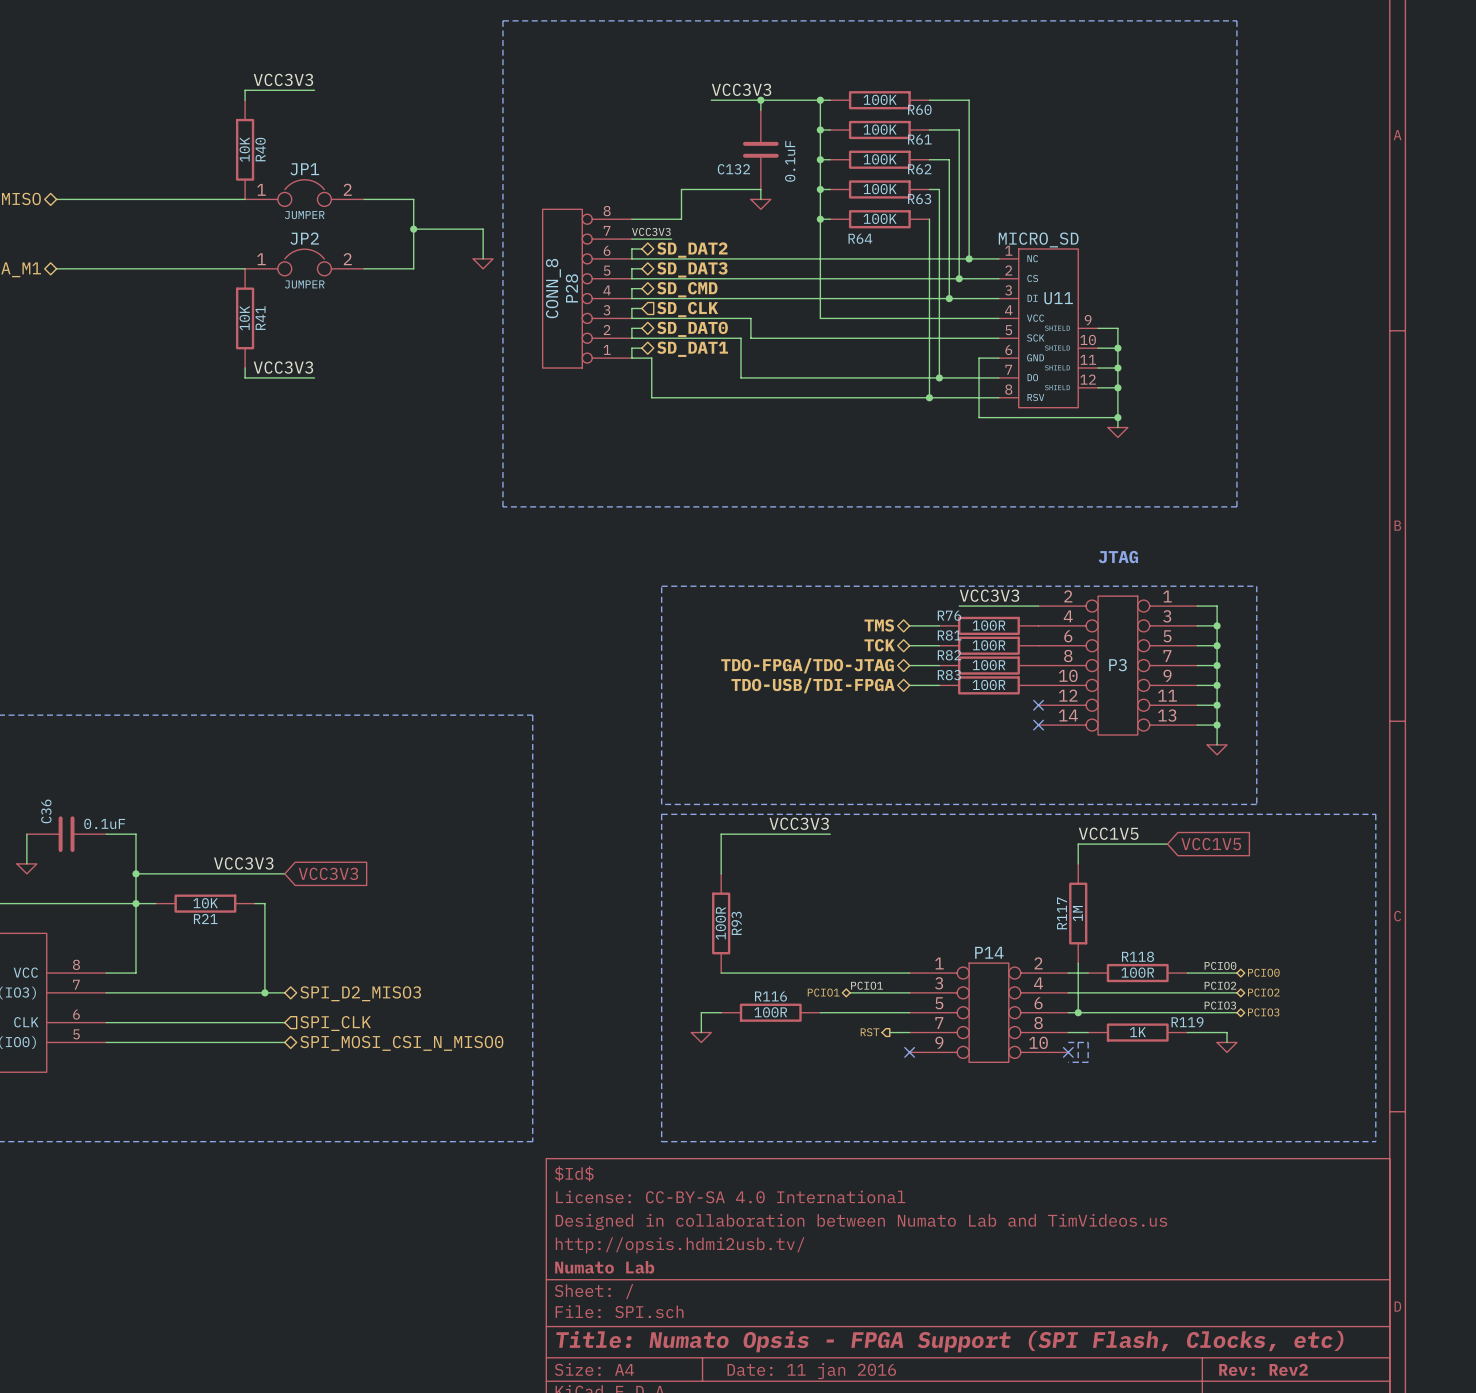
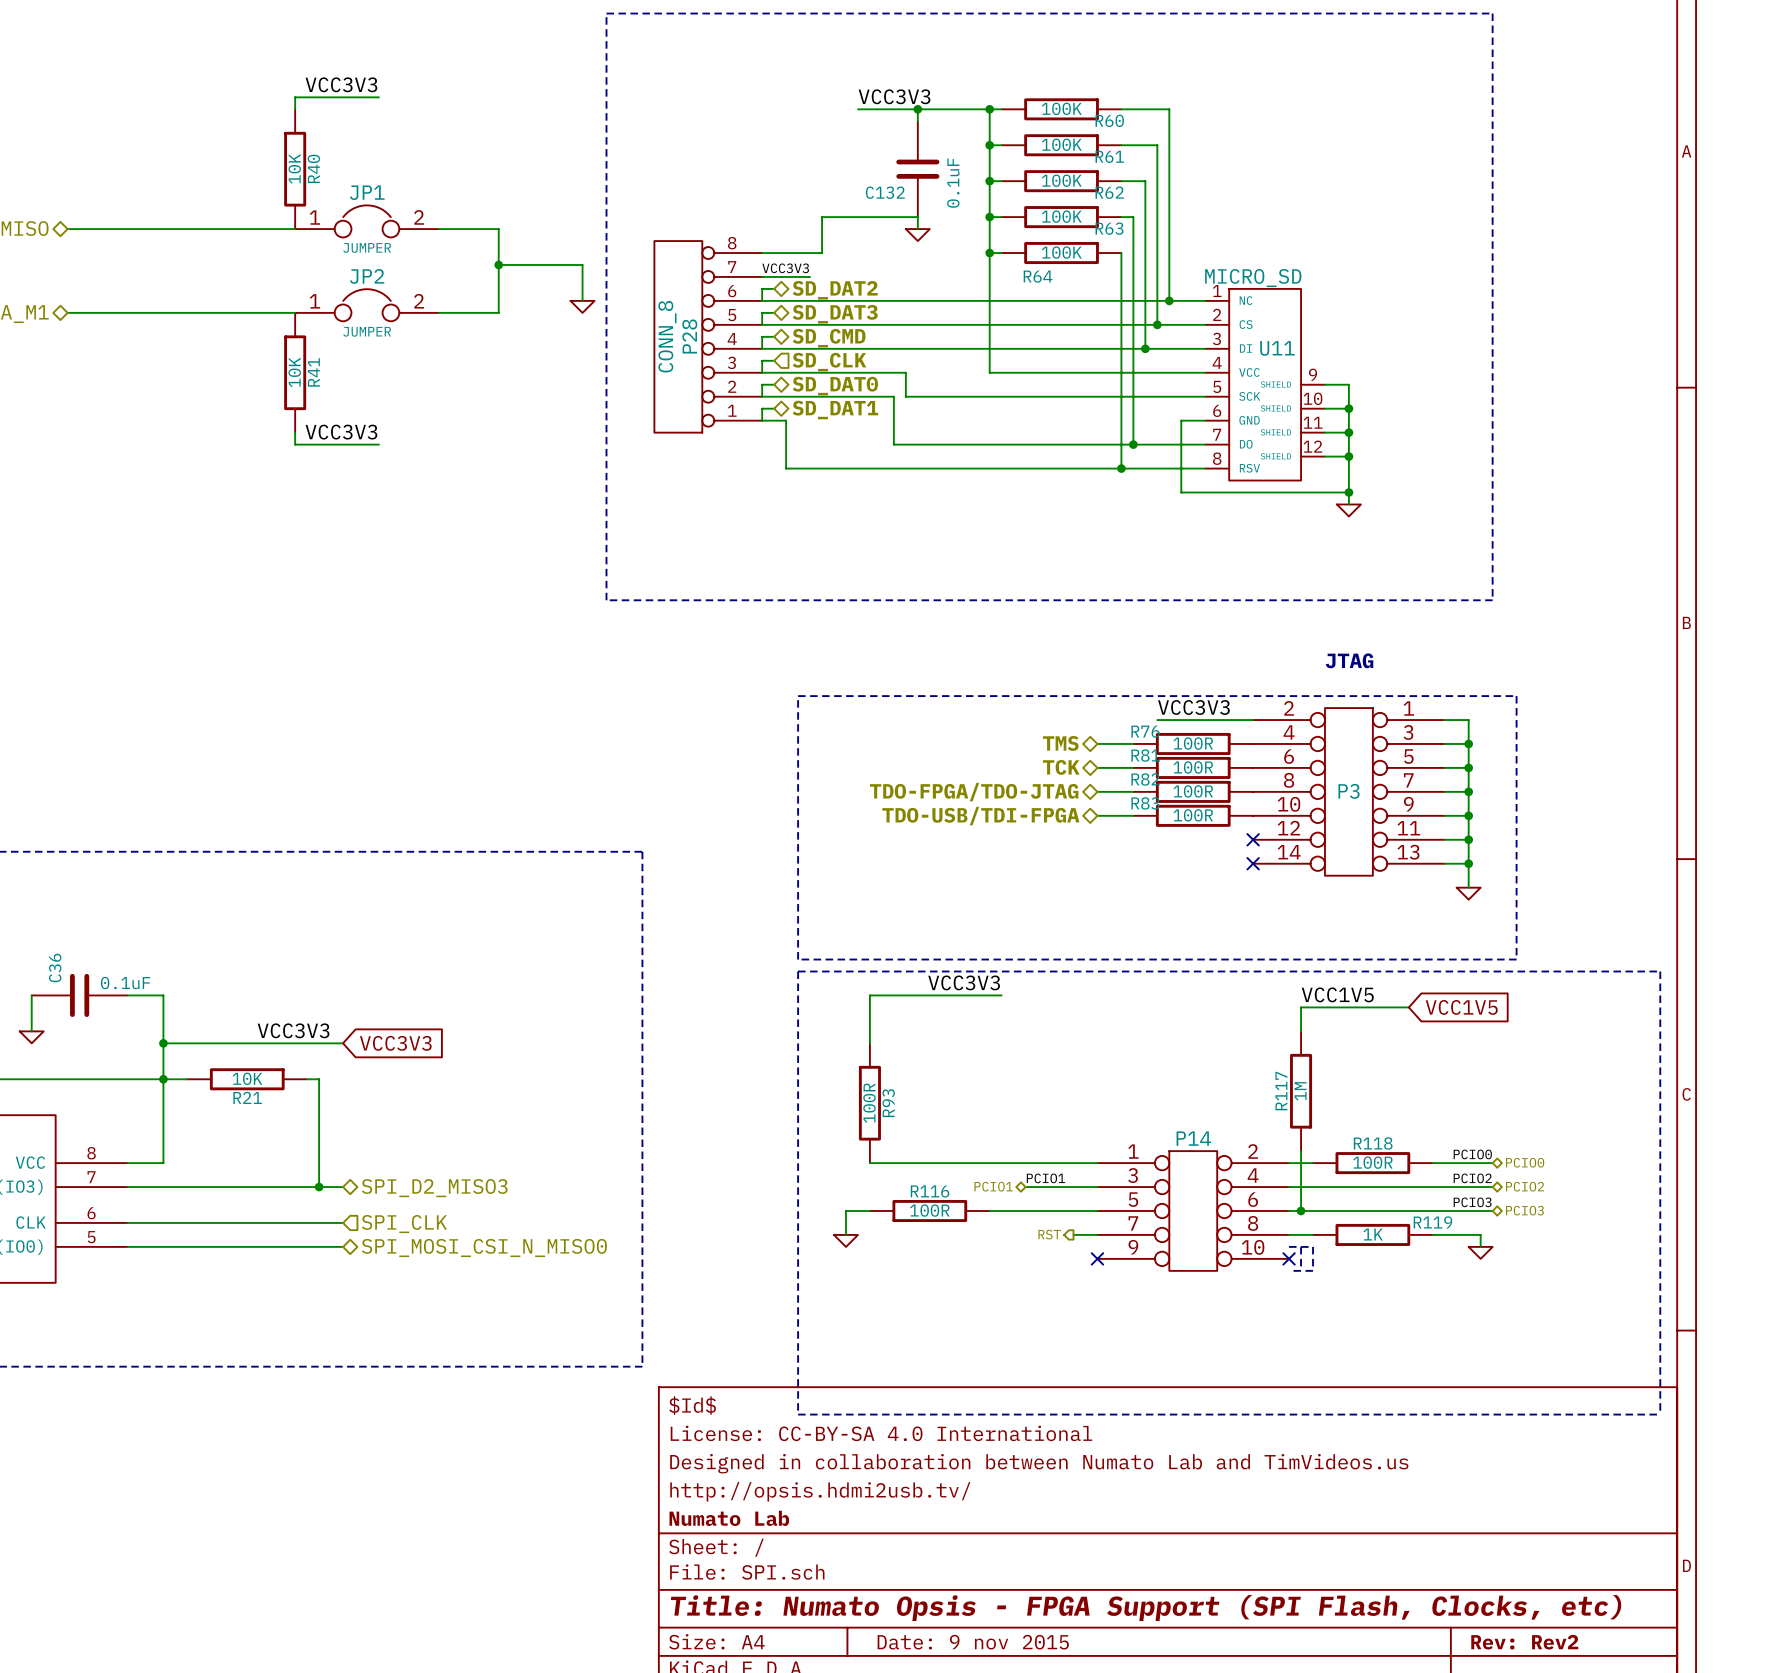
line: (661, 1141) (1375, 1141) -> (798, 1366) (798, 1414) (1660, 1414) (1660, 1366)
title block: Date: 11 jan 2016 (811, 1371) -> Date: 9 nov 2015 (973, 1642)

